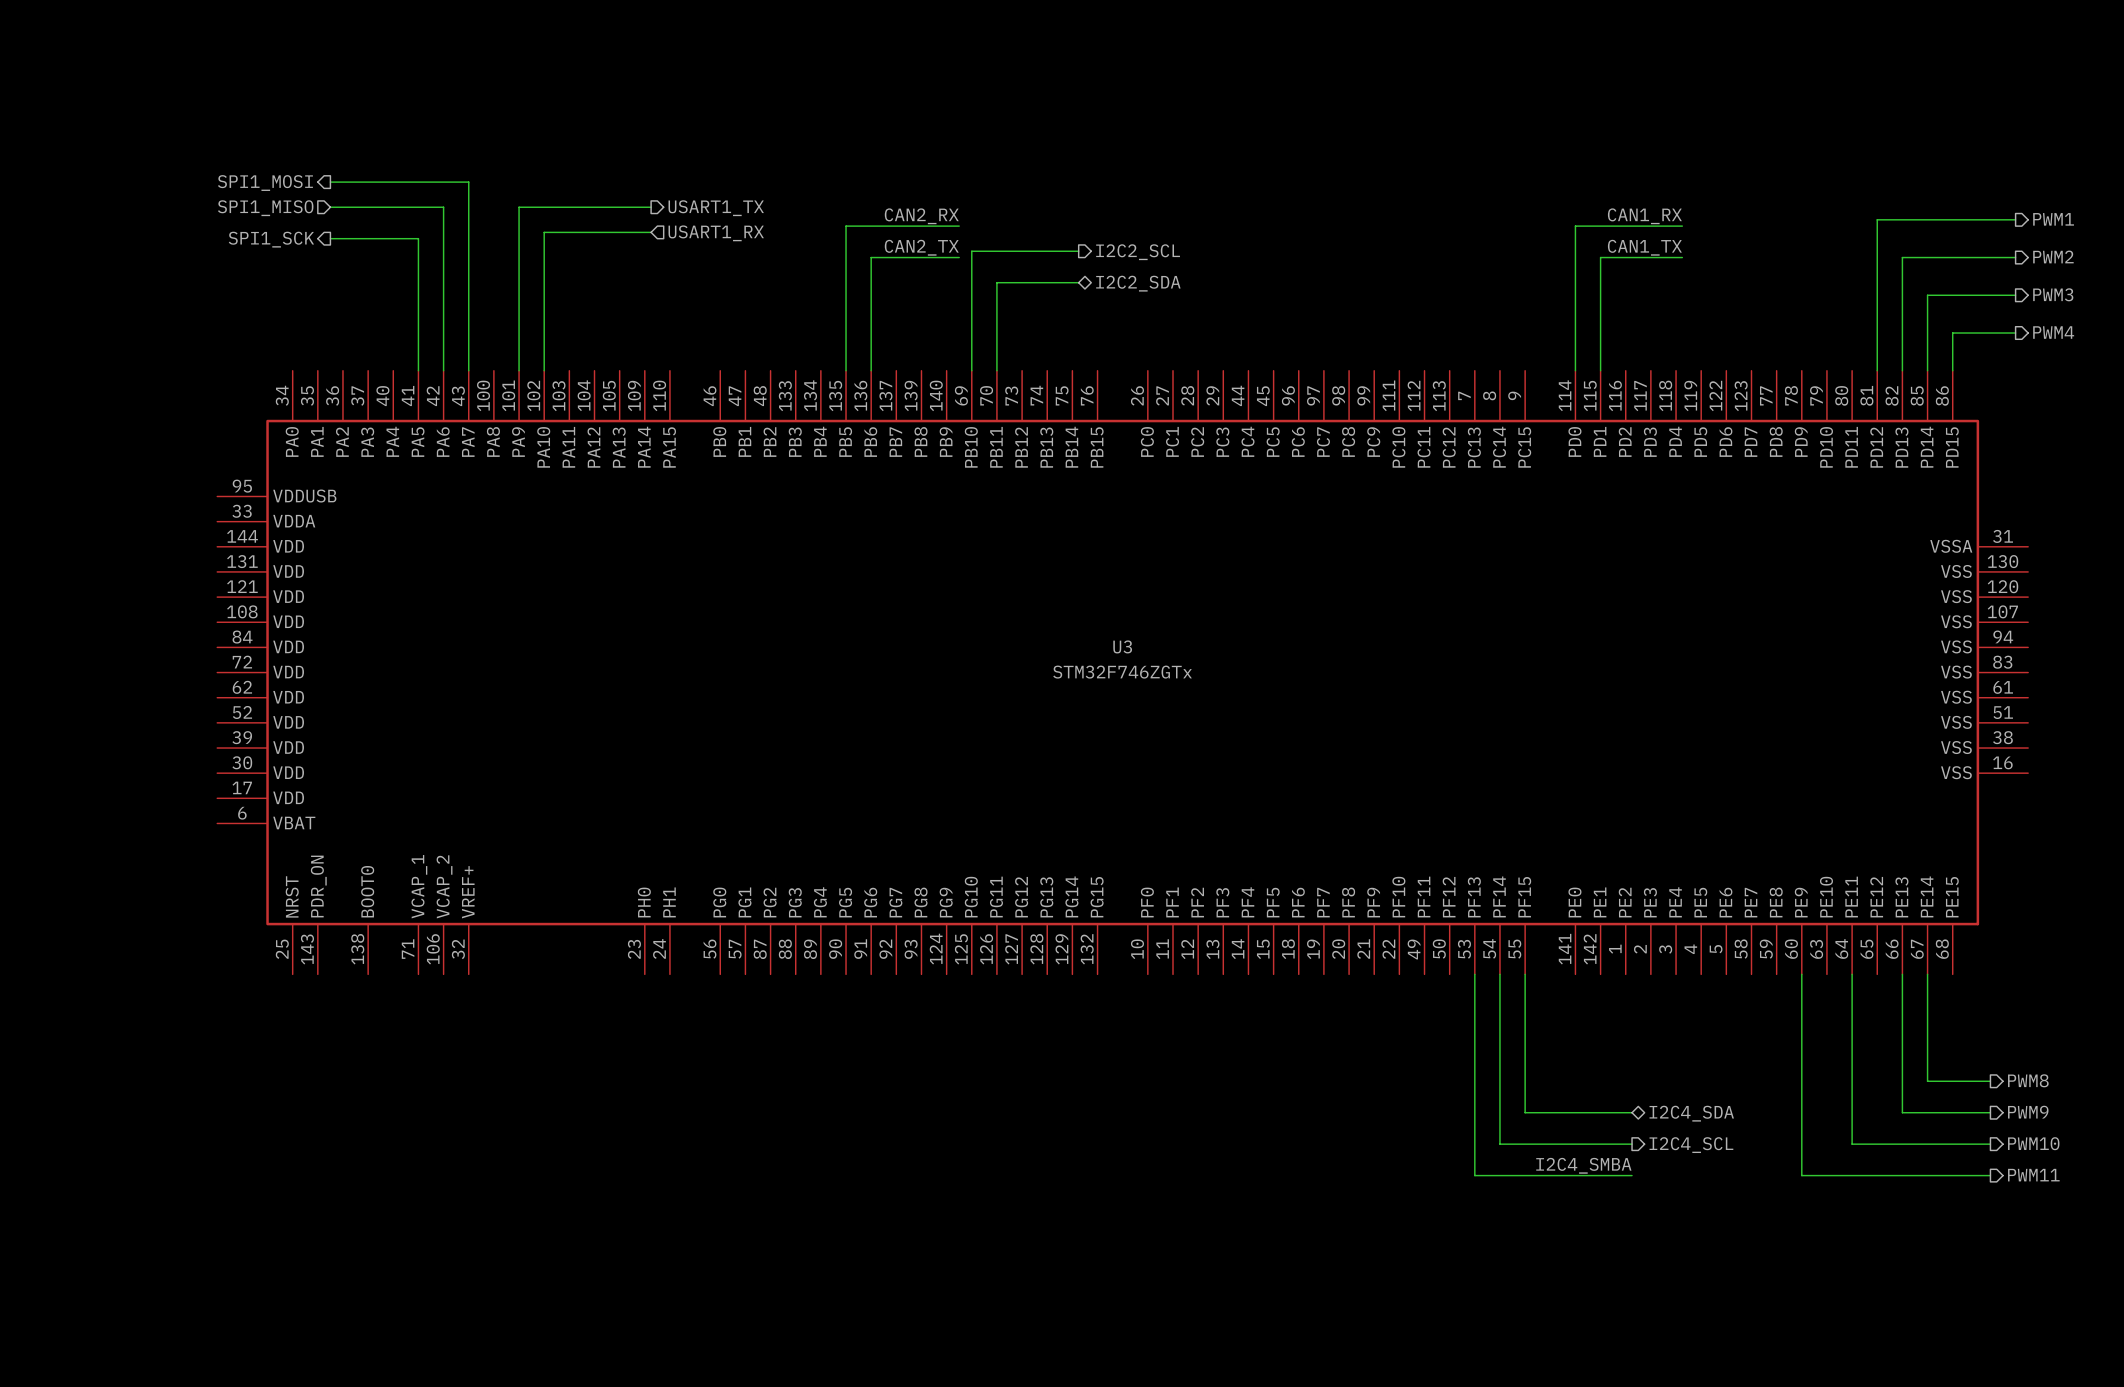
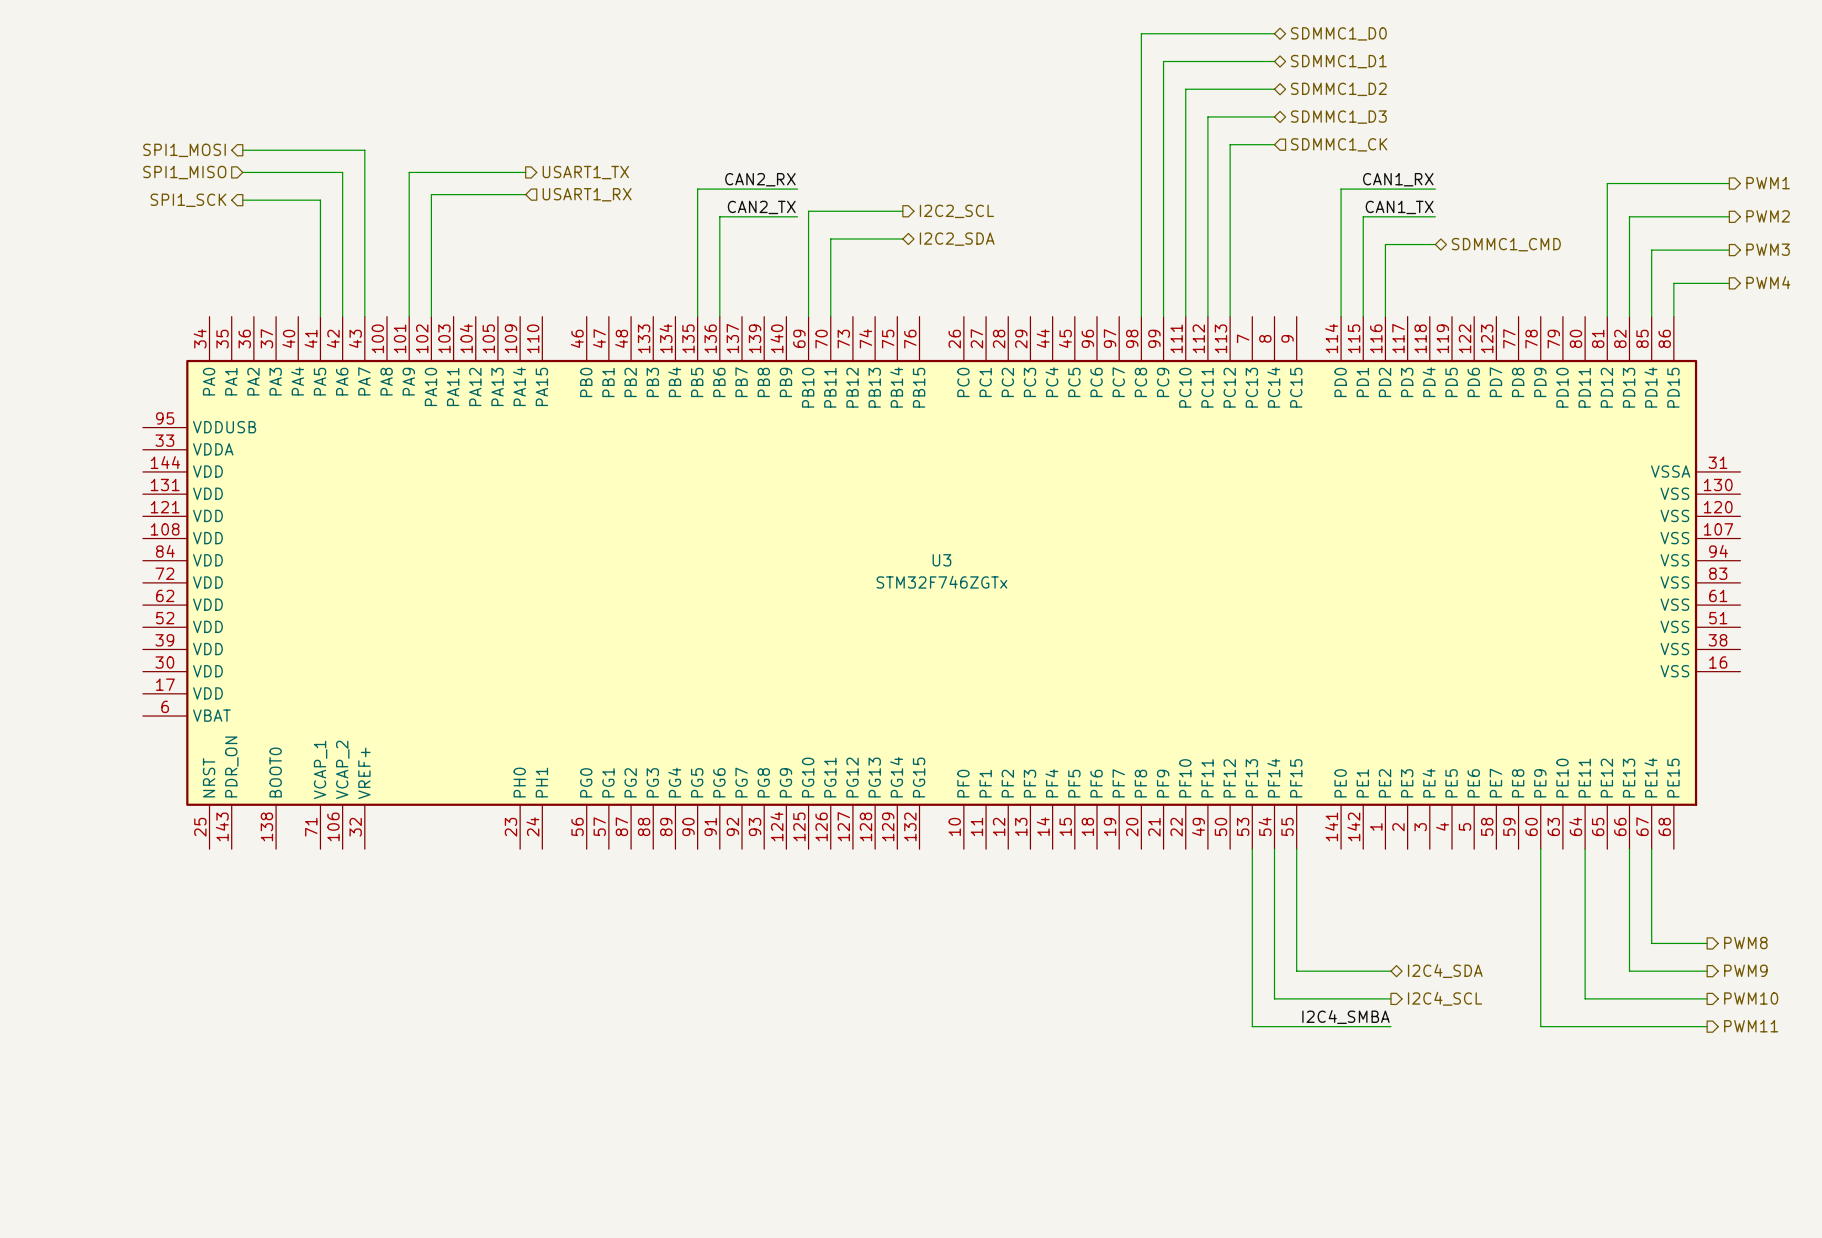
wire: none -> (1274, 33) (1141, 33) (1141, 316)
hierarchical label: none -> SDMMC1_D0 (1338, 33)
wire: none -> (1274, 61) (1163, 61) (1163, 316)
hierarchical label: none -> SDMMC1_D1 (1338, 61)
wire: none -> (1274, 89) (1185, 89) (1185, 316)
hierarchical label: none -> SDMMC1_D2 (1338, 89)
wire: none -> (1274, 116) (1207, 116) (1207, 316)
hierarchical label: none -> SDMMC1_D3 (1338, 117)
wire: none -> (1274, 144) (1230, 144) (1230, 316)
hierarchical label: none -> SDMMC1_CK (1339, 144)
wire: none -> (1435, 244) (1385, 244) (1385, 316)
hierarchical label: none -> SDMMC1_CMD (1506, 244)

